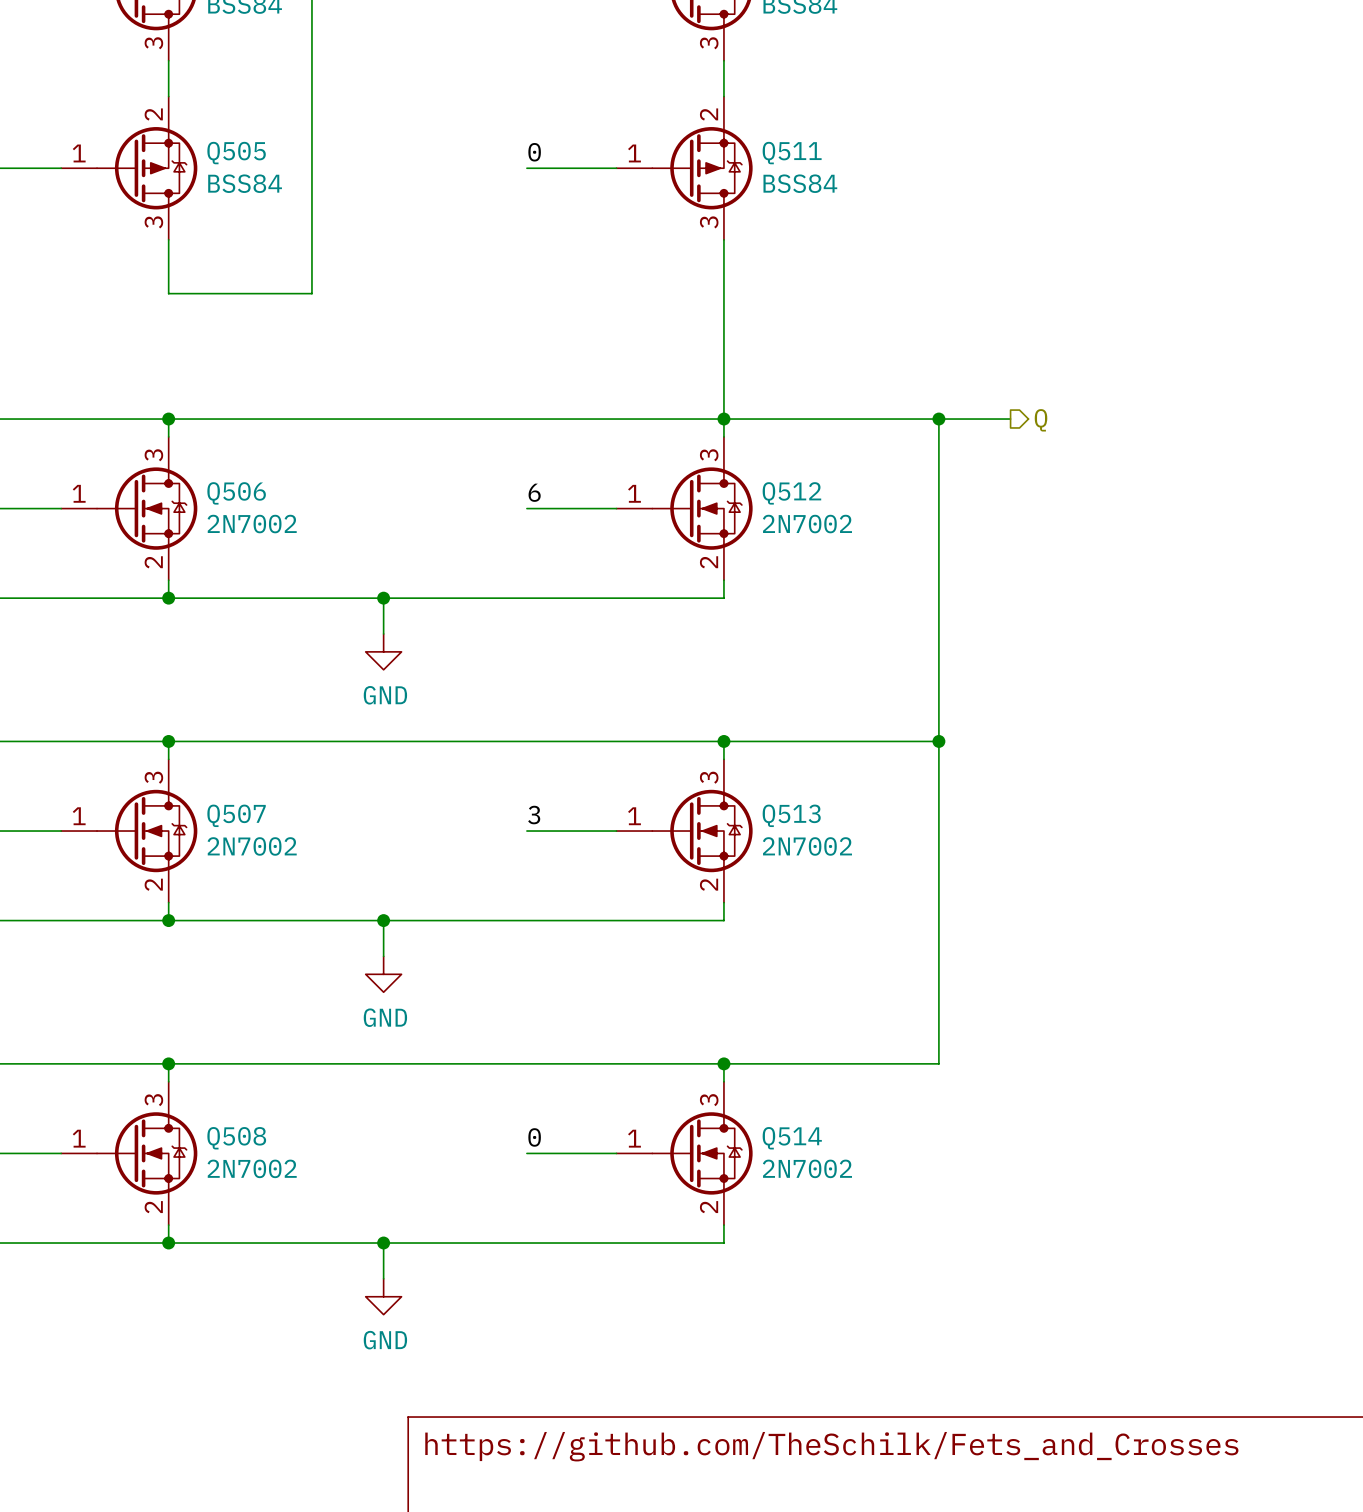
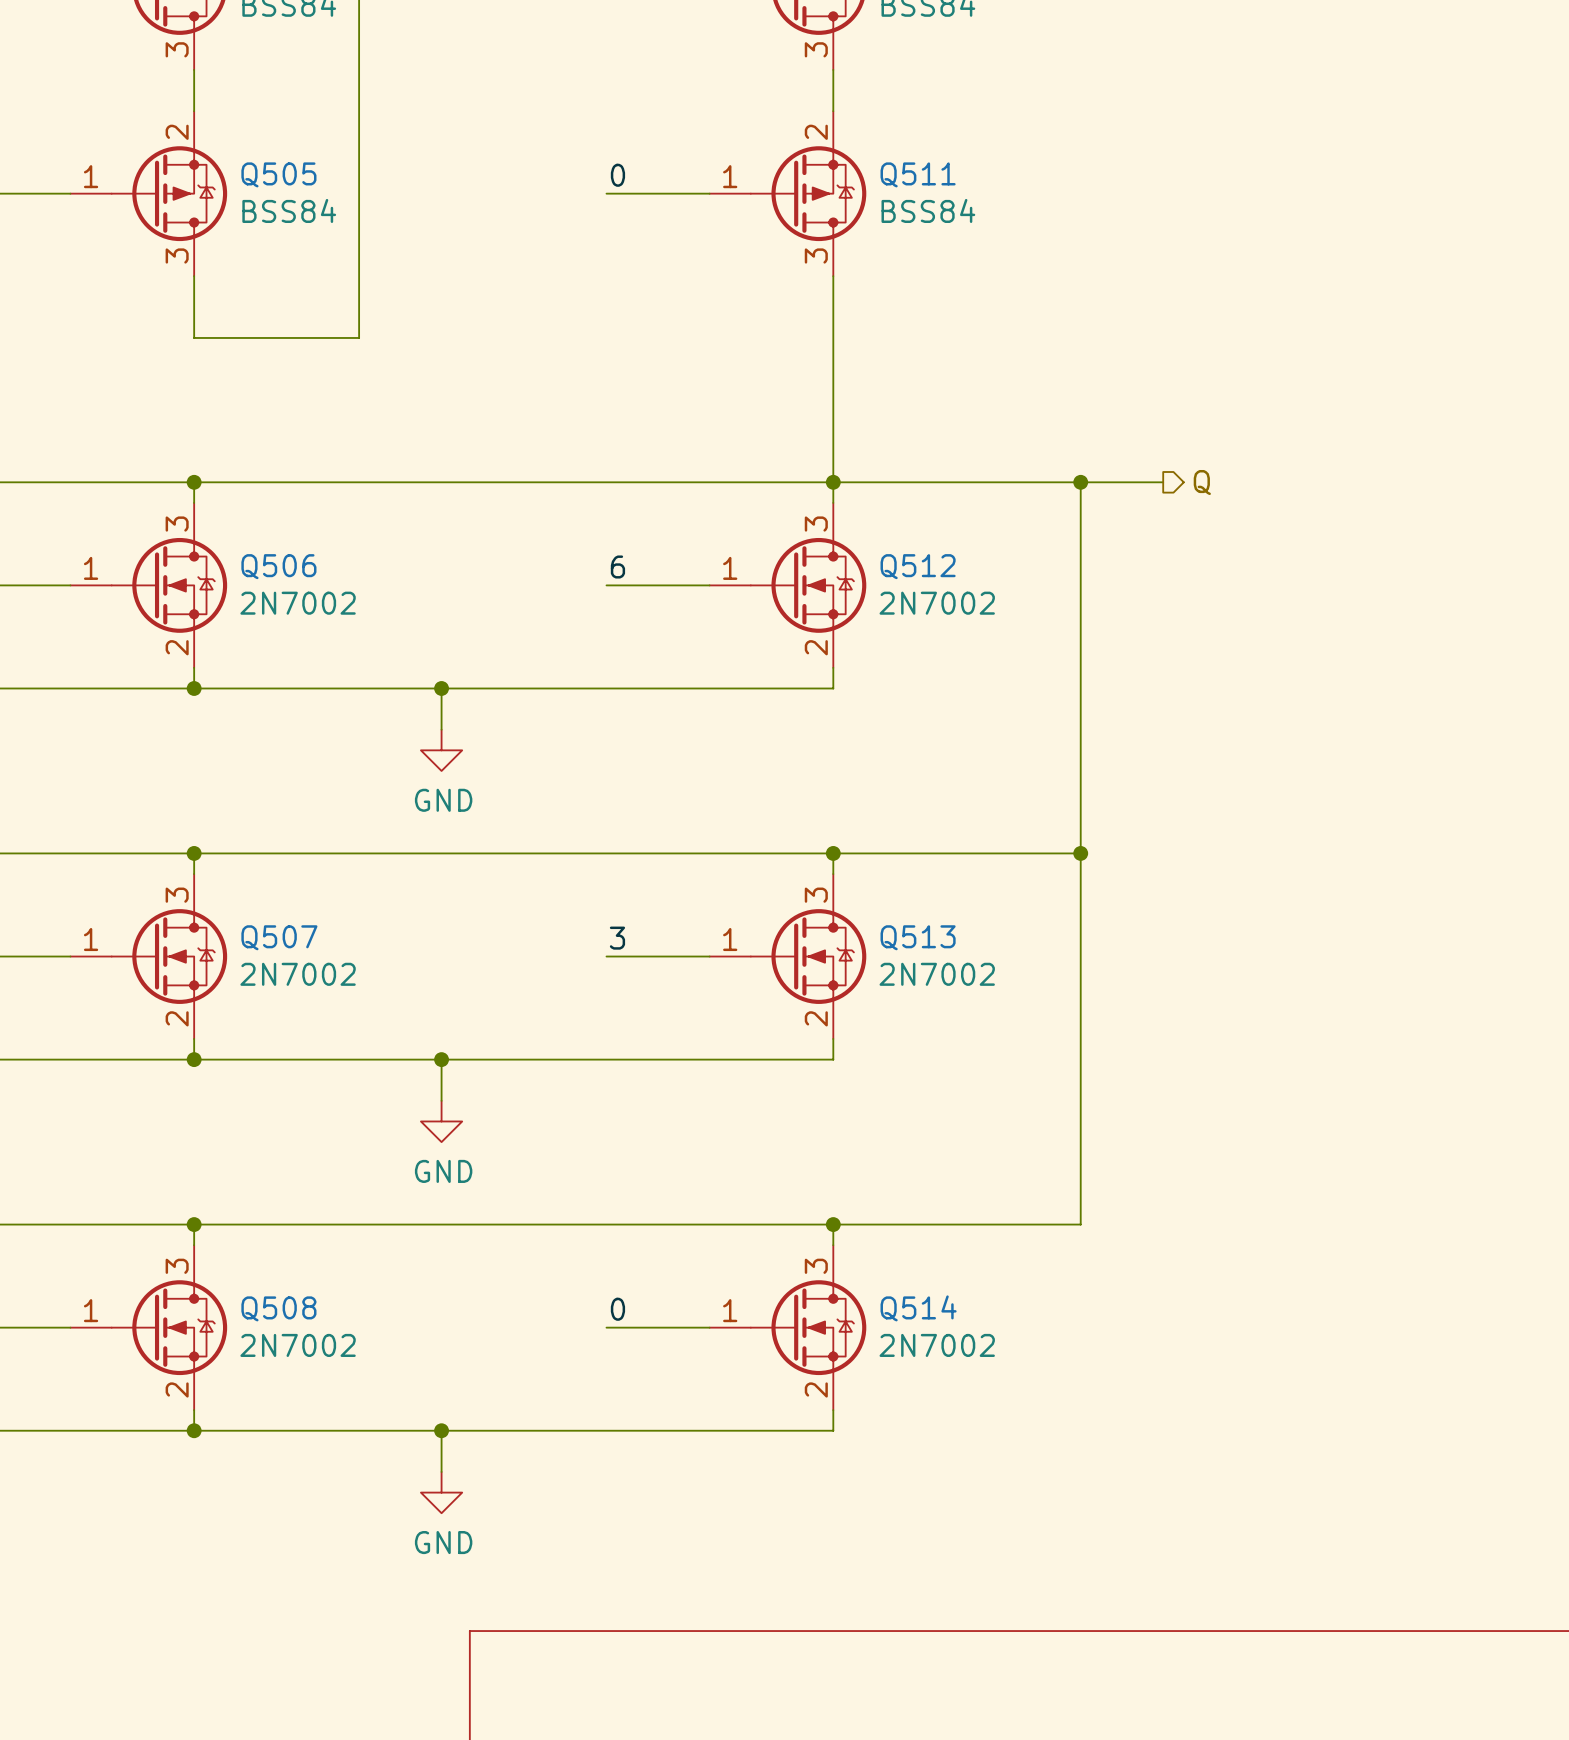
title block: https://github.com/TheSchilk/Fets_and_Crosses (831, 1446) -> none

